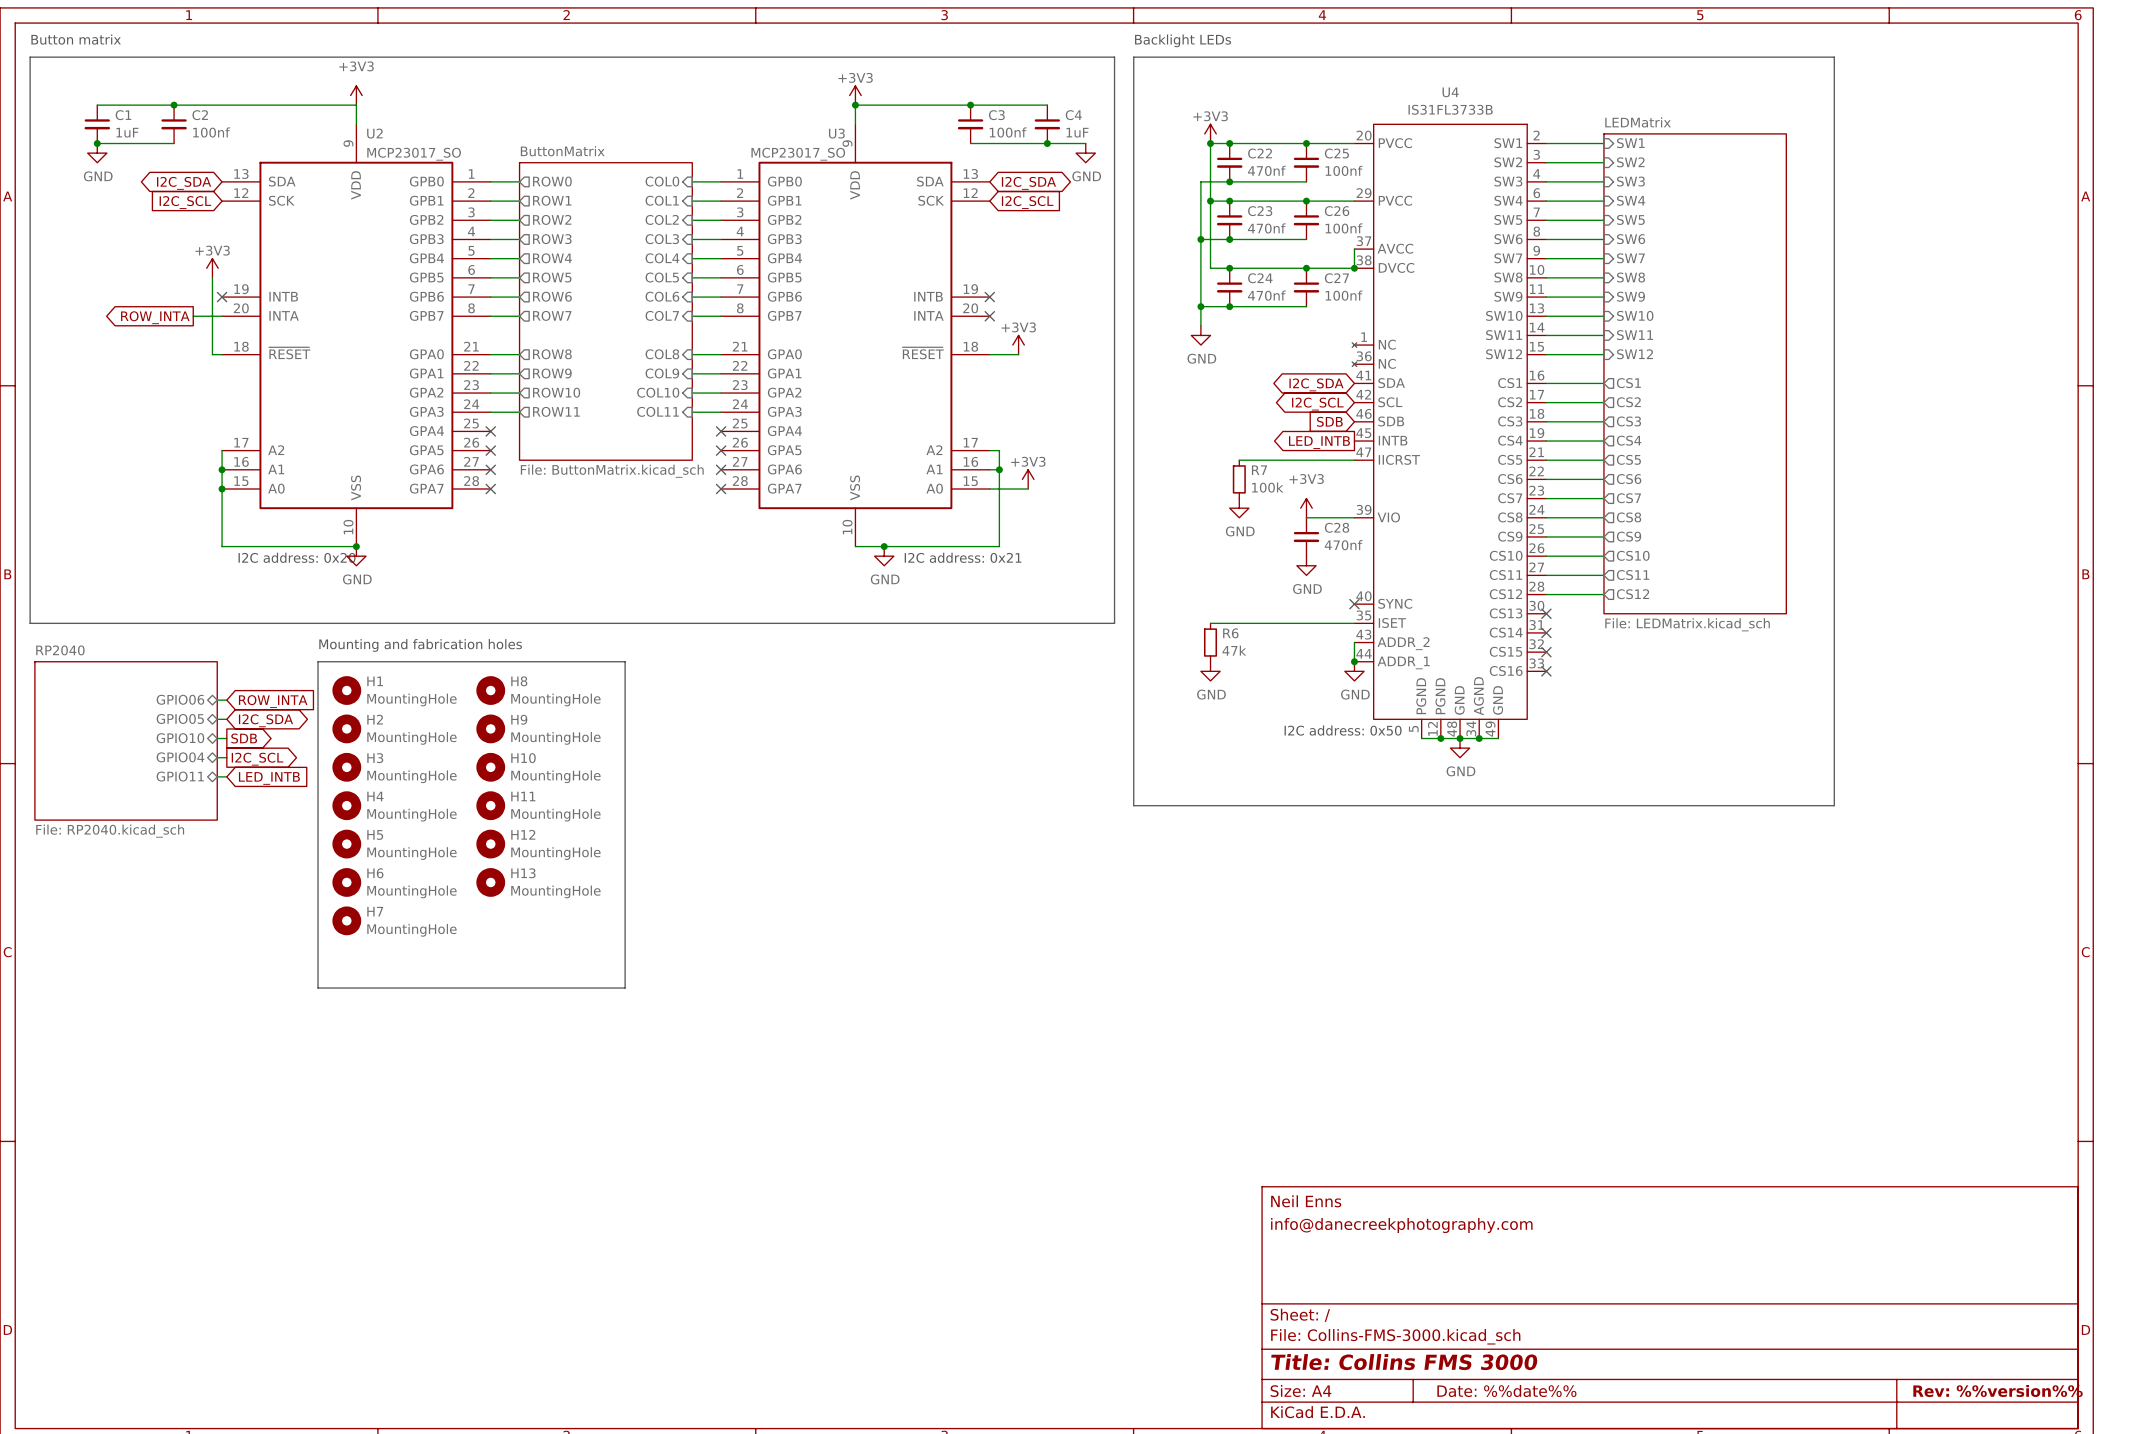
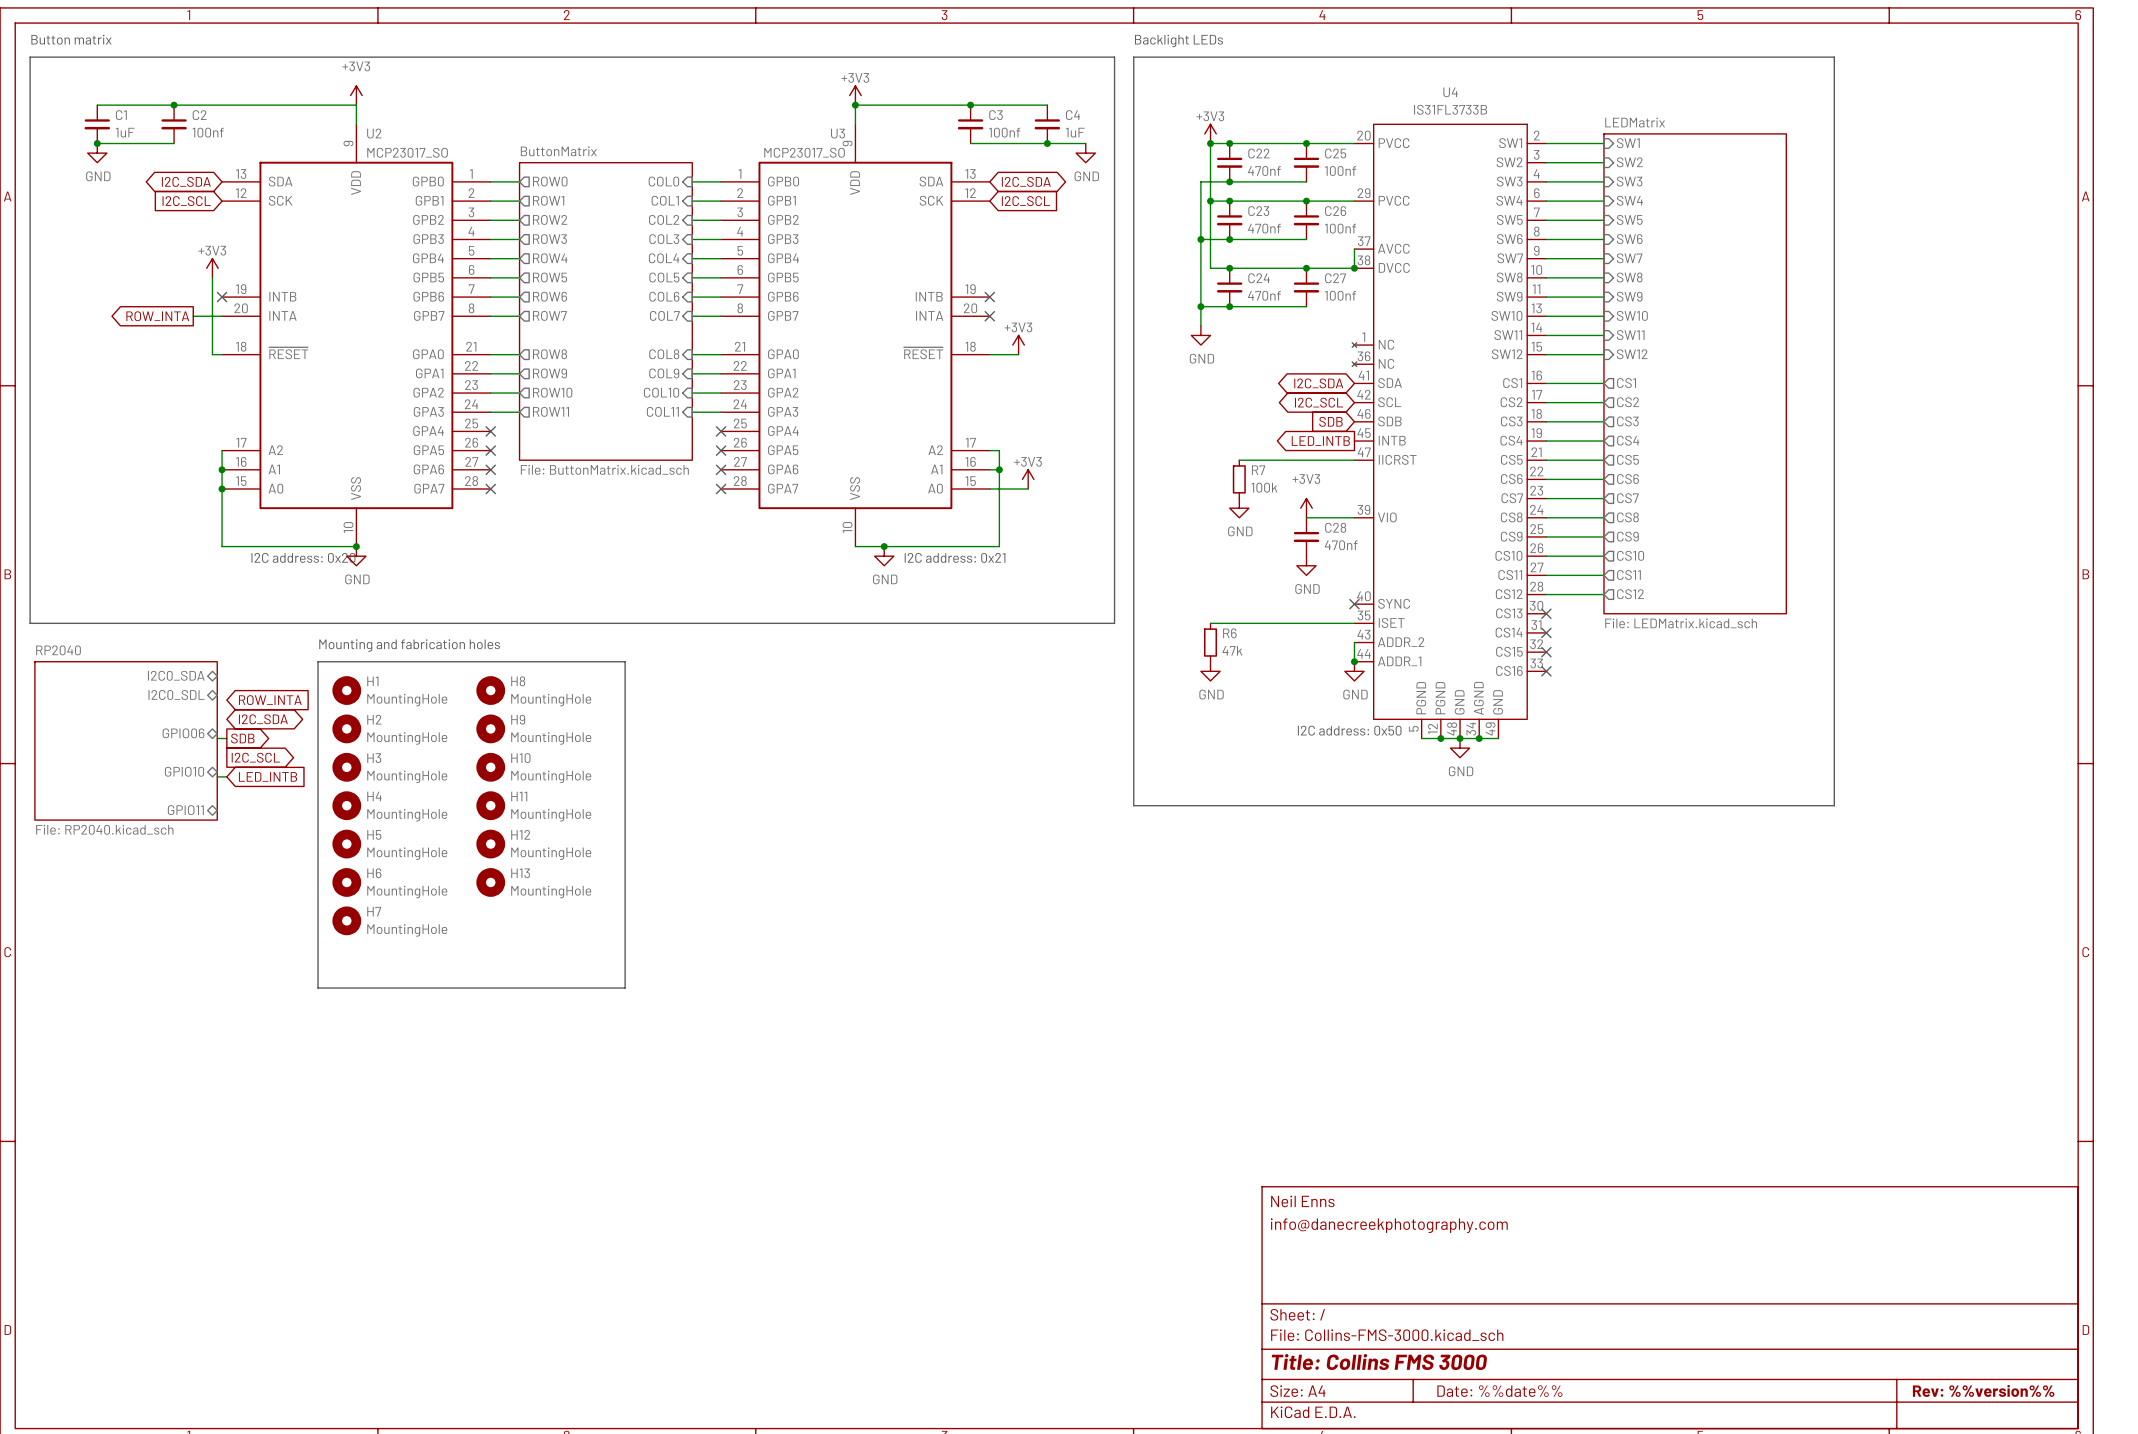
sheet pin: none -> I2C0_SDA (176, 675)
sheet pin: none -> I2C0_SDL (176, 694)
sheet pin position: GPIO06 (180, 699) -> GPIO06 (183, 733)
wire: (217, 700) (226, 700) -> none
sheet pin: GPIO05 (180, 718) -> none
wire: (217, 719) (226, 719) -> none
sheet pin position: GPIO10 (180, 738) -> GPIO10 (184, 771)
sheet pin: GPIO04 (180, 757) -> none
wire: (217, 757) (226, 757) -> none
sheet pin position: GPIO11 (180, 776) -> GPIO11 (185, 810)

